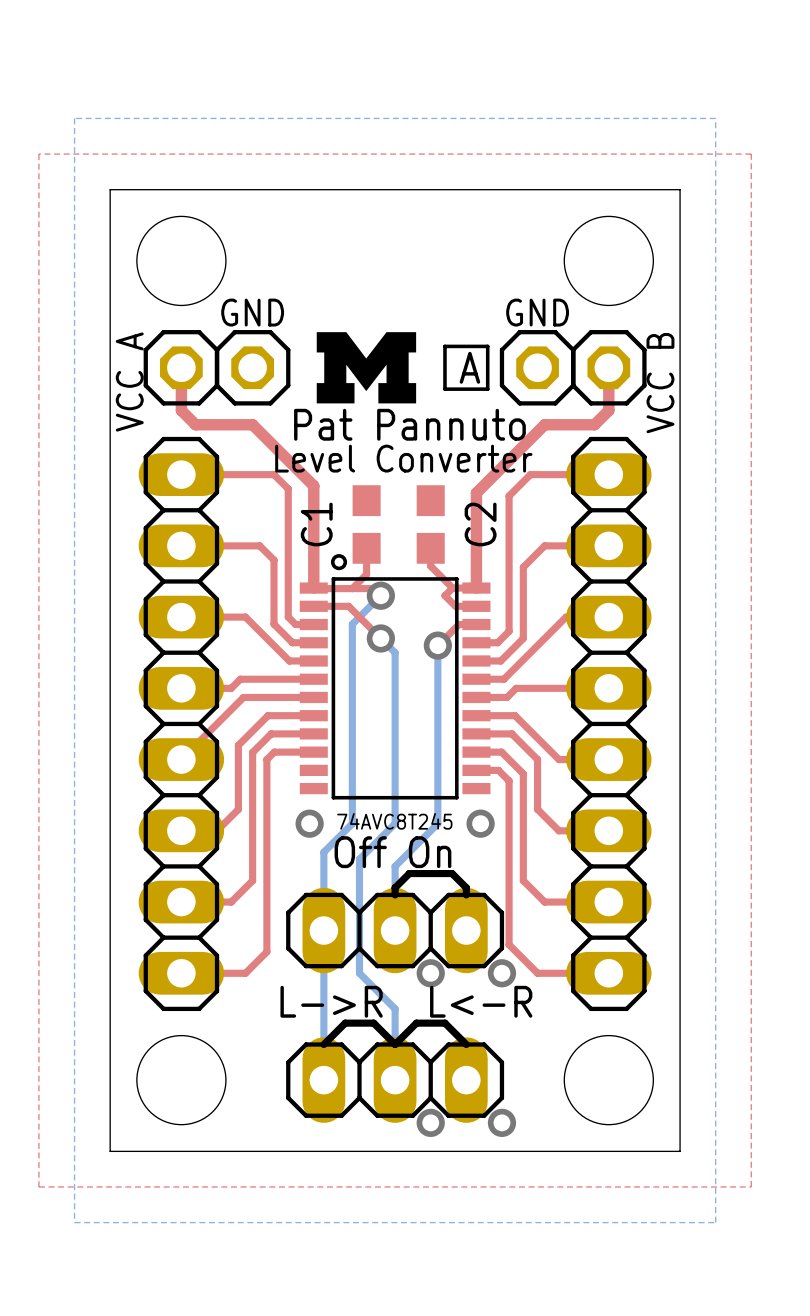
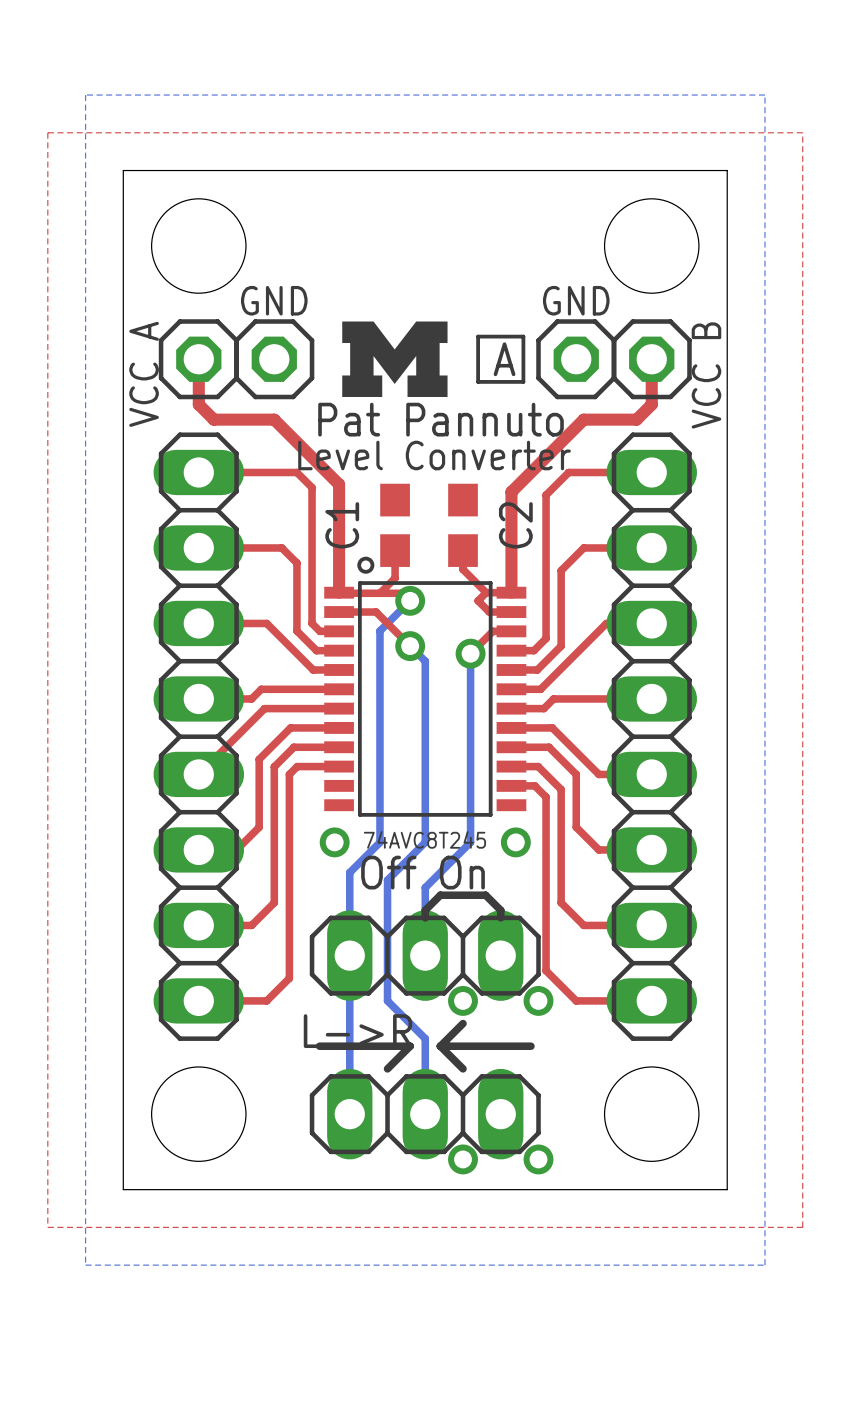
line: none -> (463, 1023) (440, 1046)
text: L<-R (481, 1001) -> none
line: none -> (319, 1046) (410, 1046) (387, 1068)
line: none -> (440, 1046) (530, 1046)
line: none -> (440, 1046) (463, 1068)
line: (323, 1044) (345, 1023) (373, 1023) (395, 1044) (416, 1023) (444, 1023) (466, 1044) -> none

